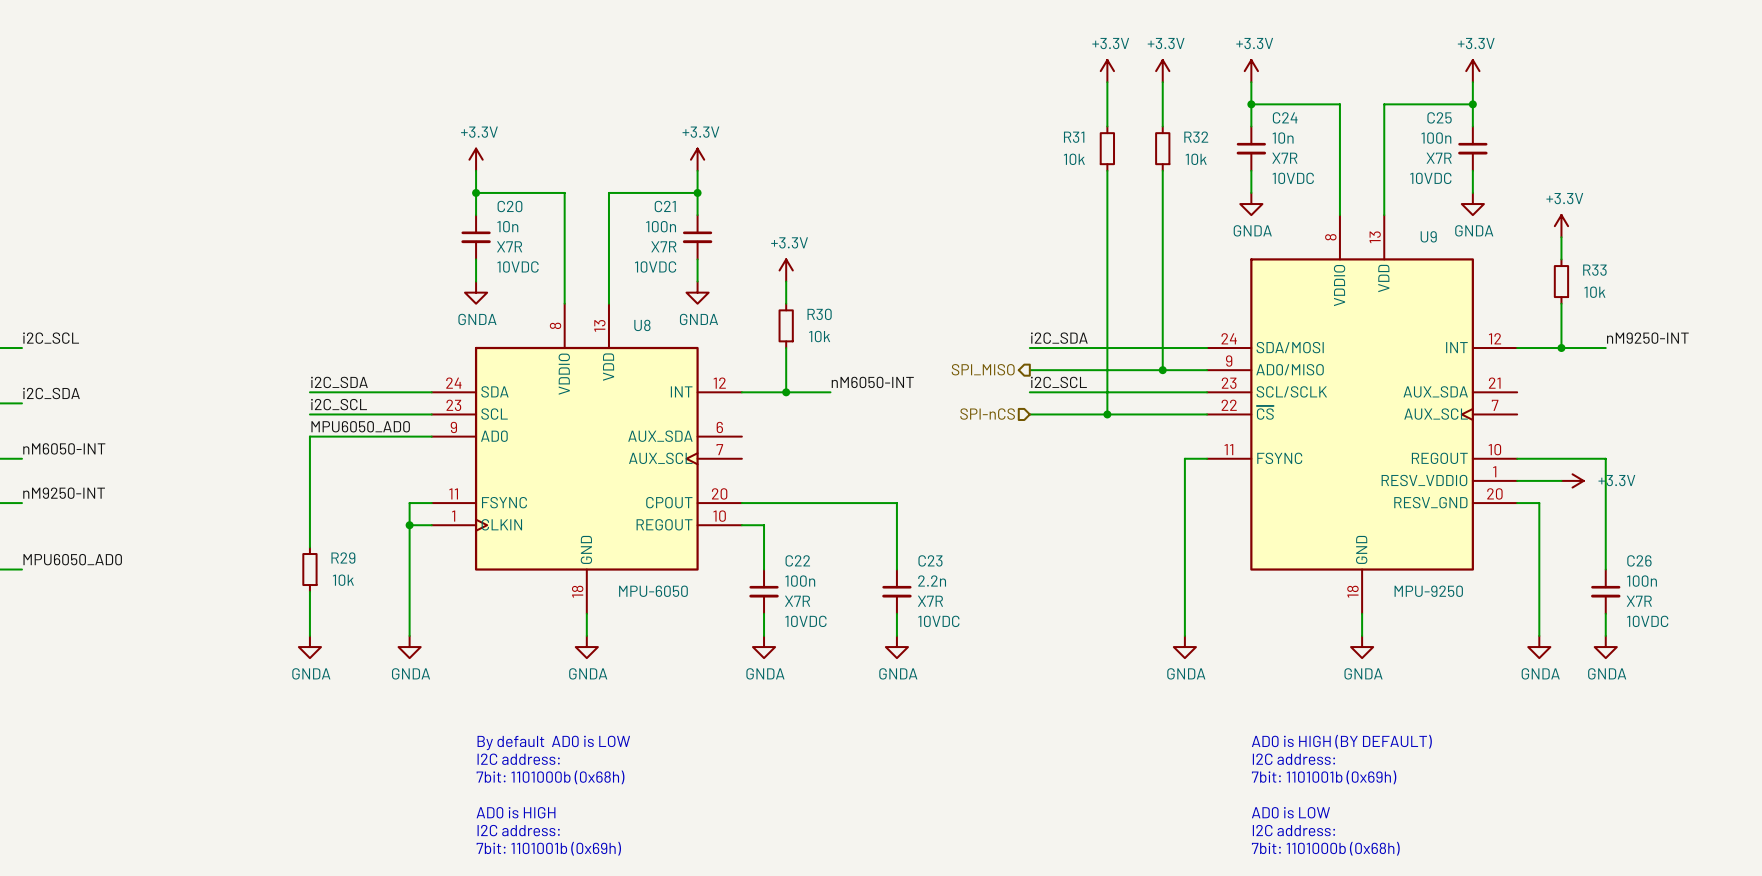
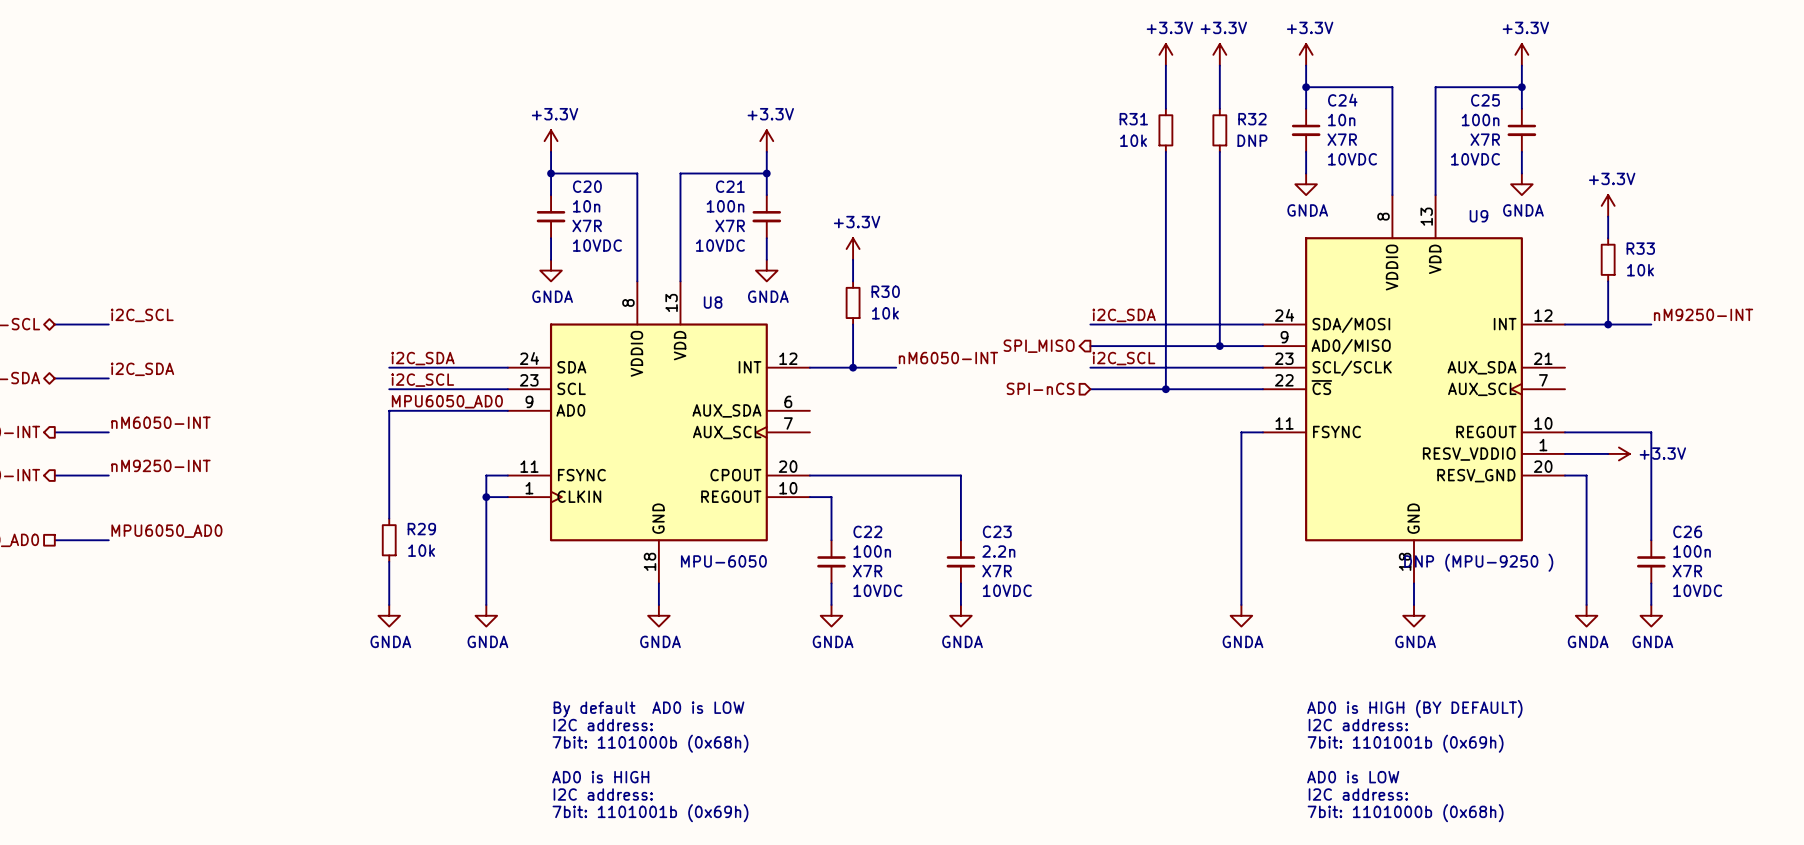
R32 value: 10k (1196, 159) -> DNP (1252, 140)
U9 value: MPU-9250 (1428, 591) -> DNP (MPU-9250 ) (1478, 562)

